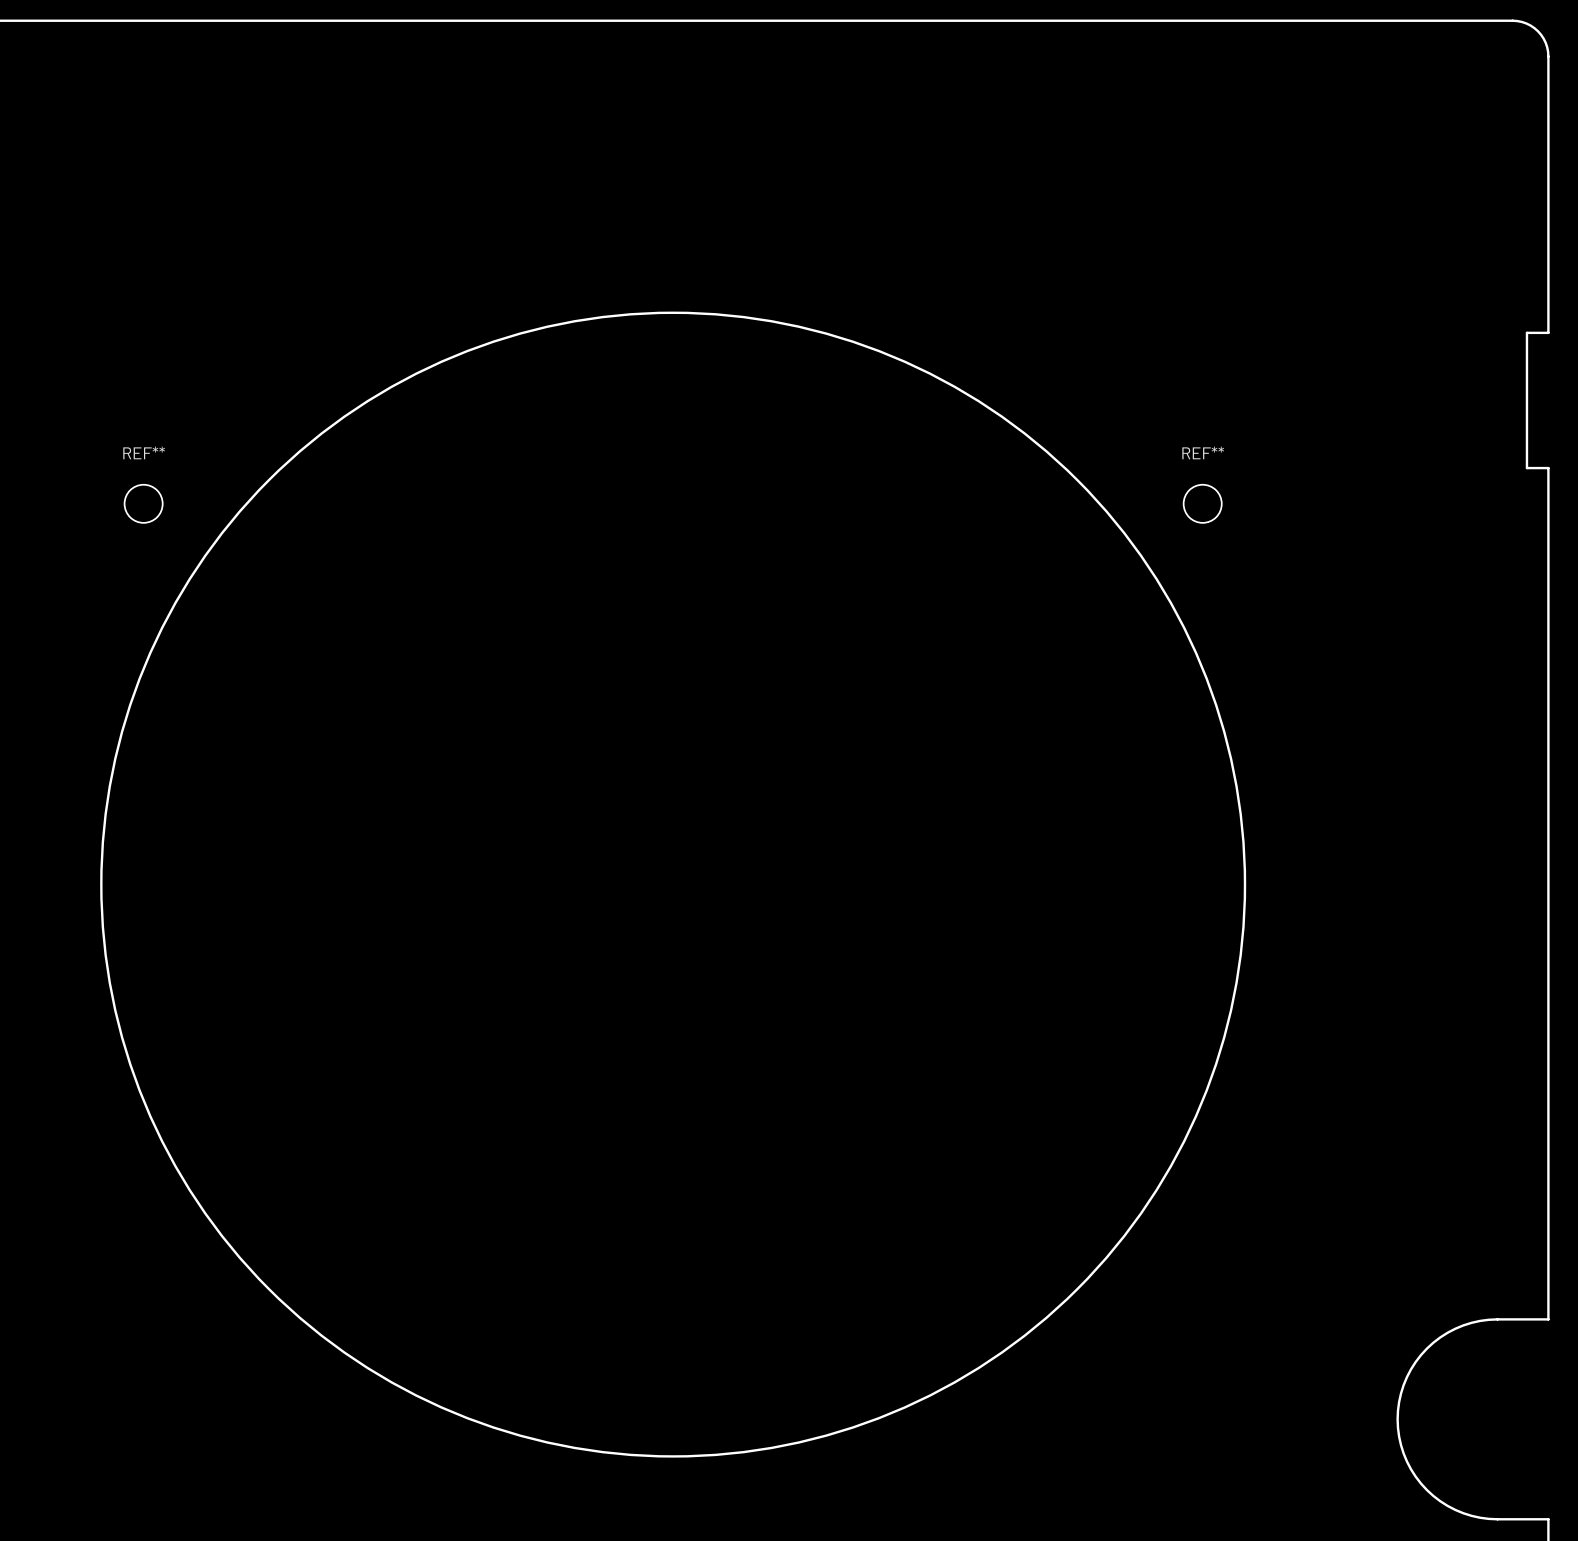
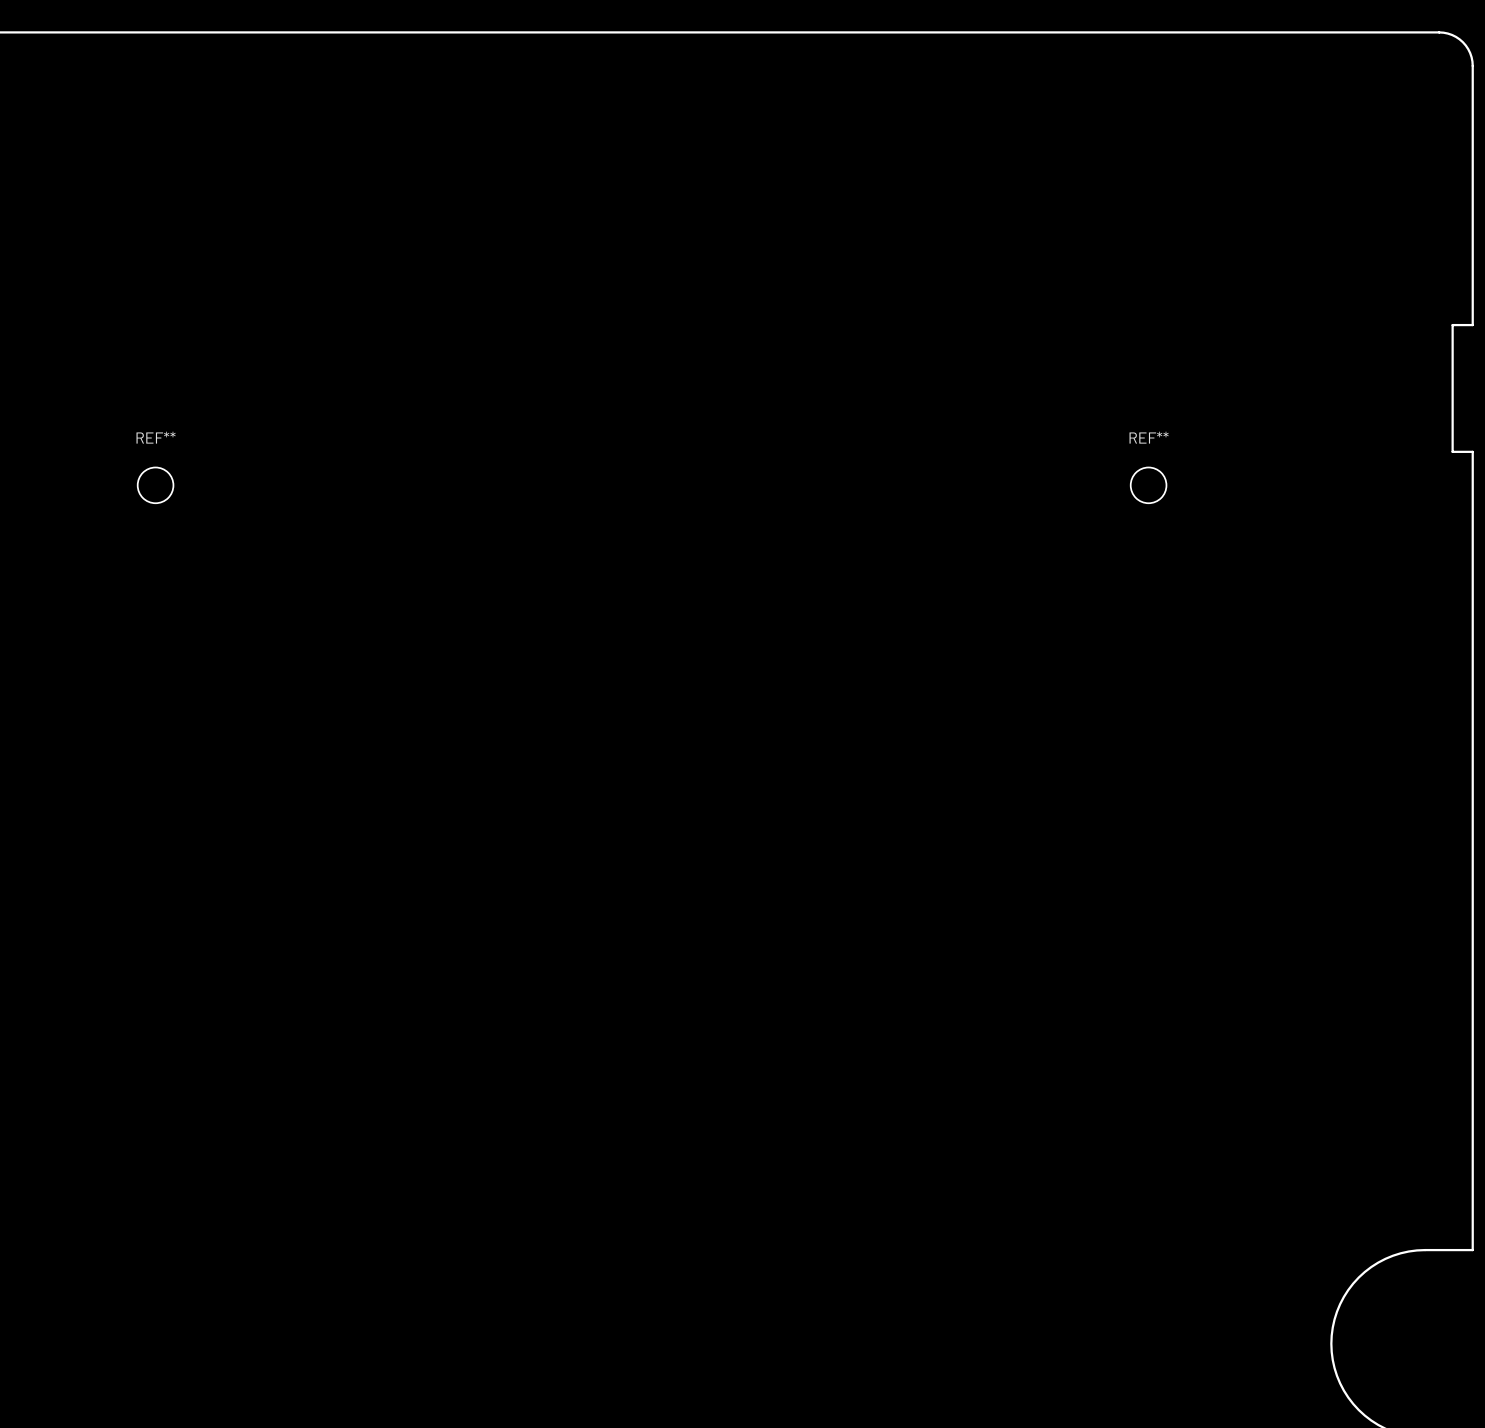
round board edge: [100, 311, 1247, 1458] -> none

